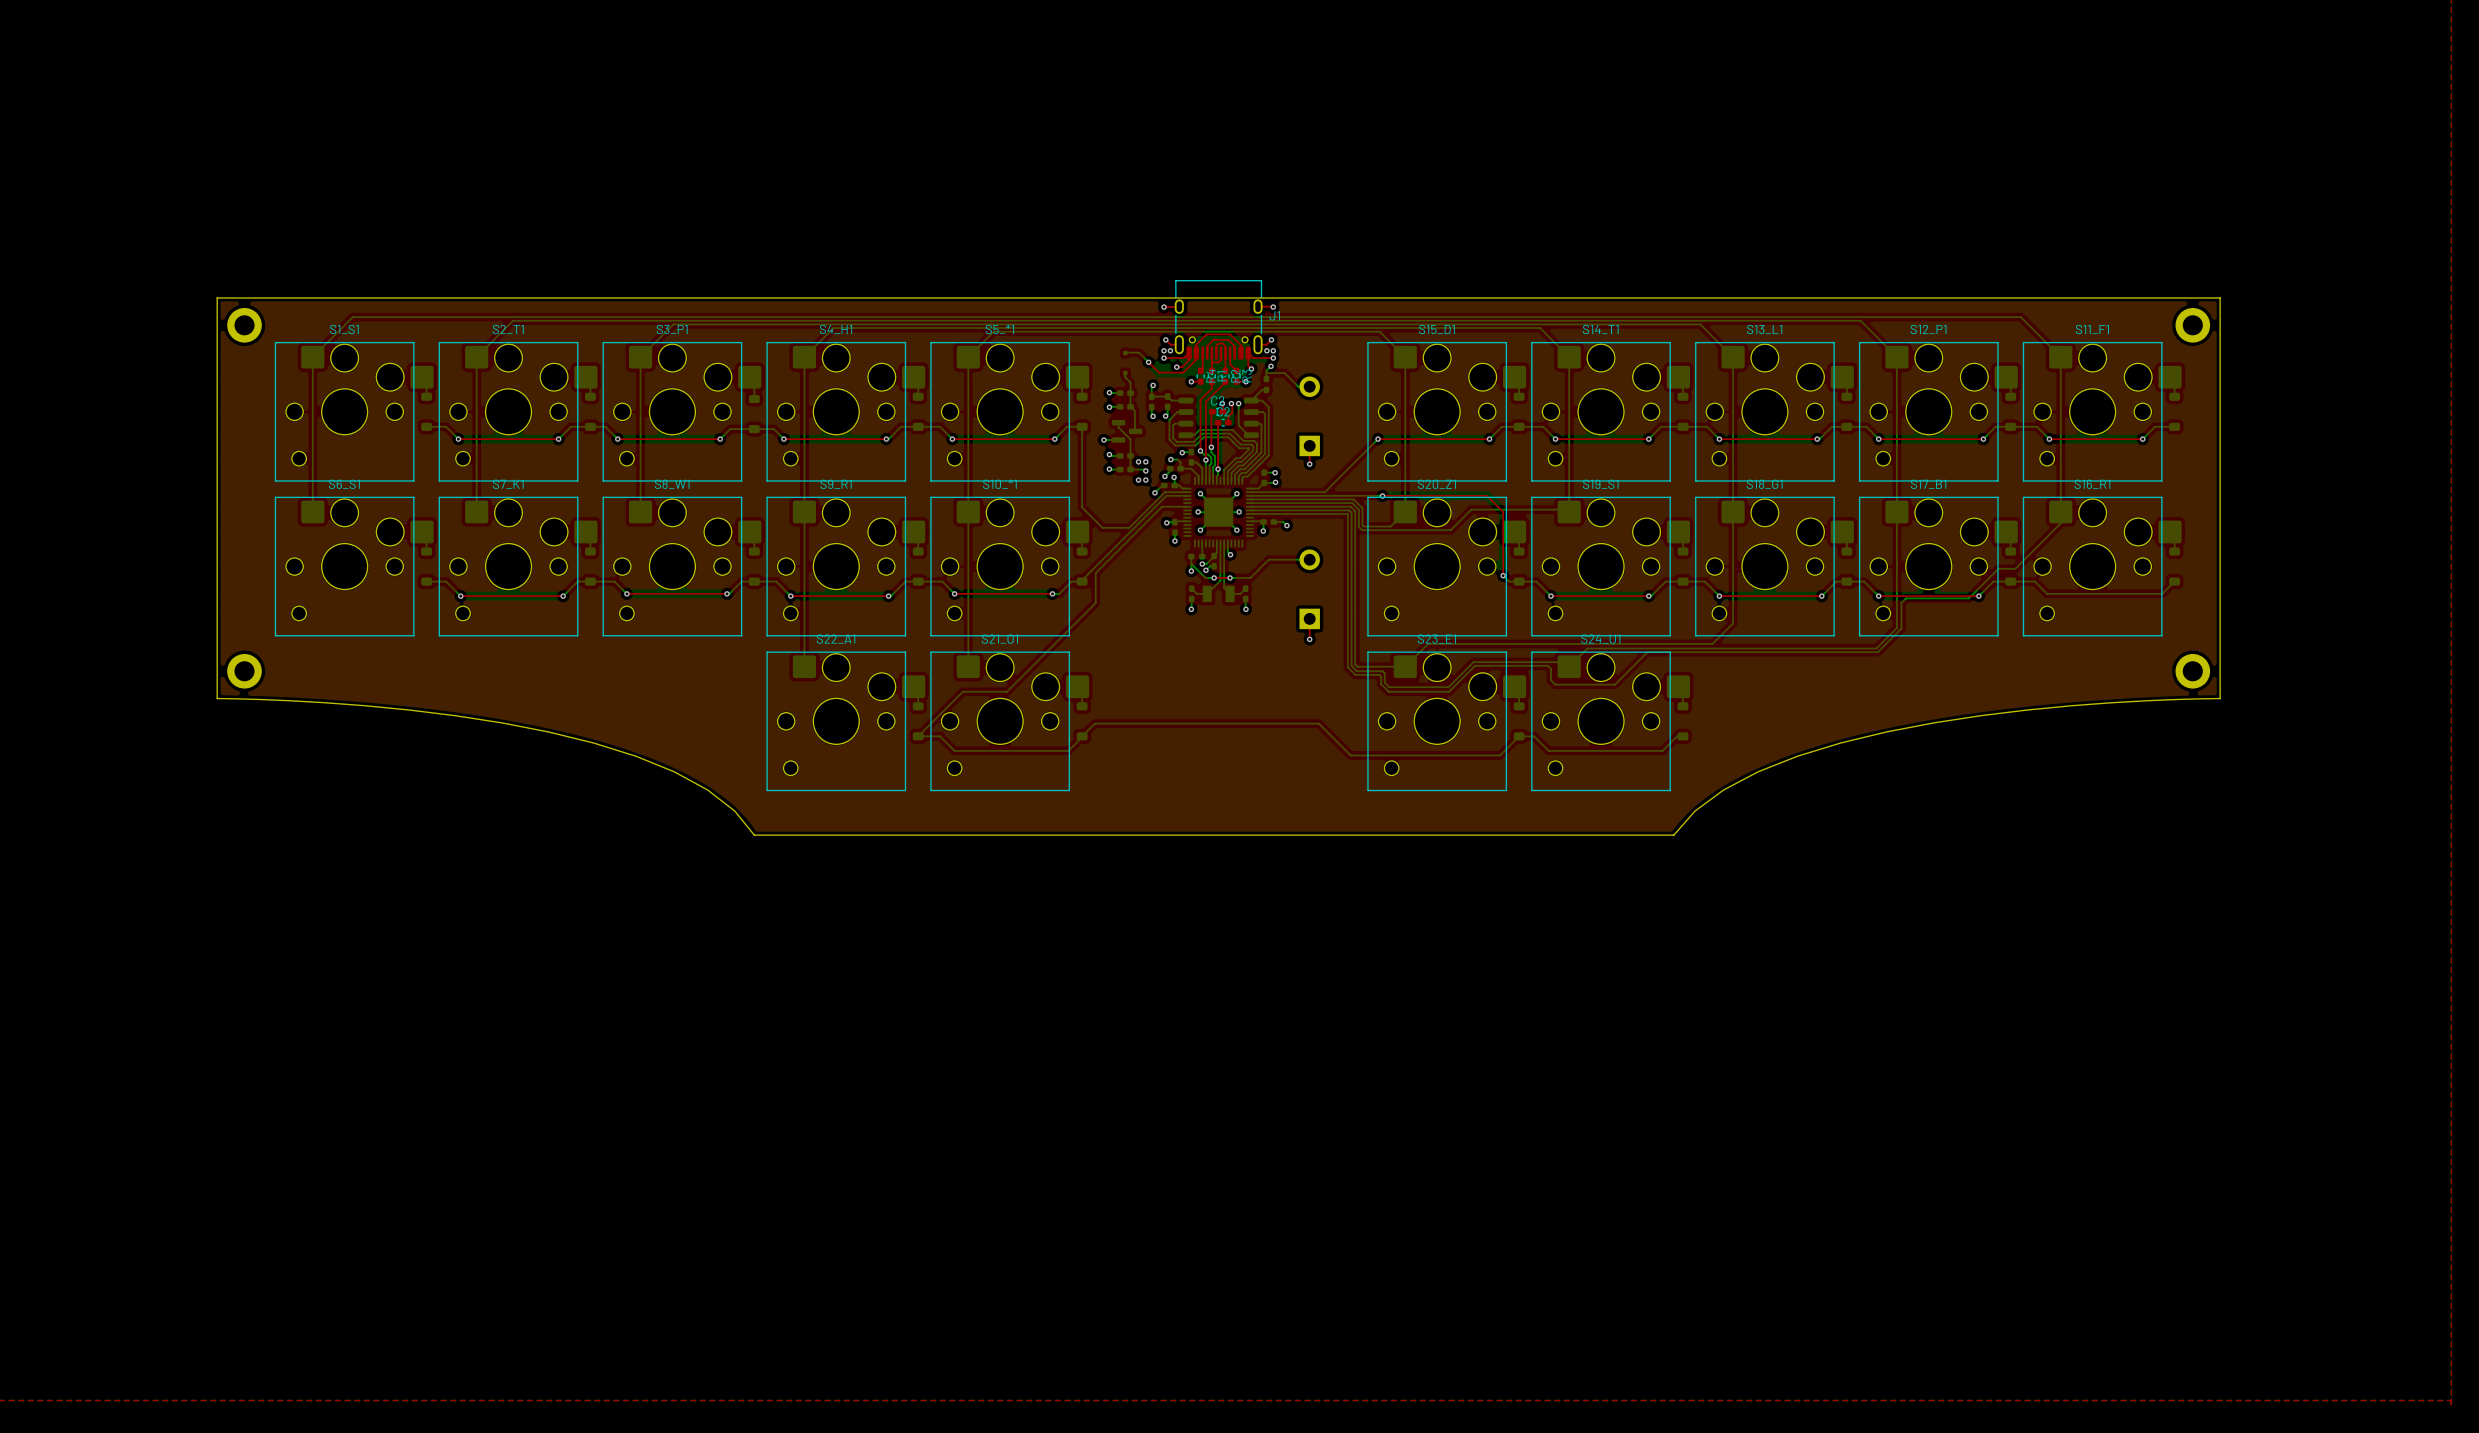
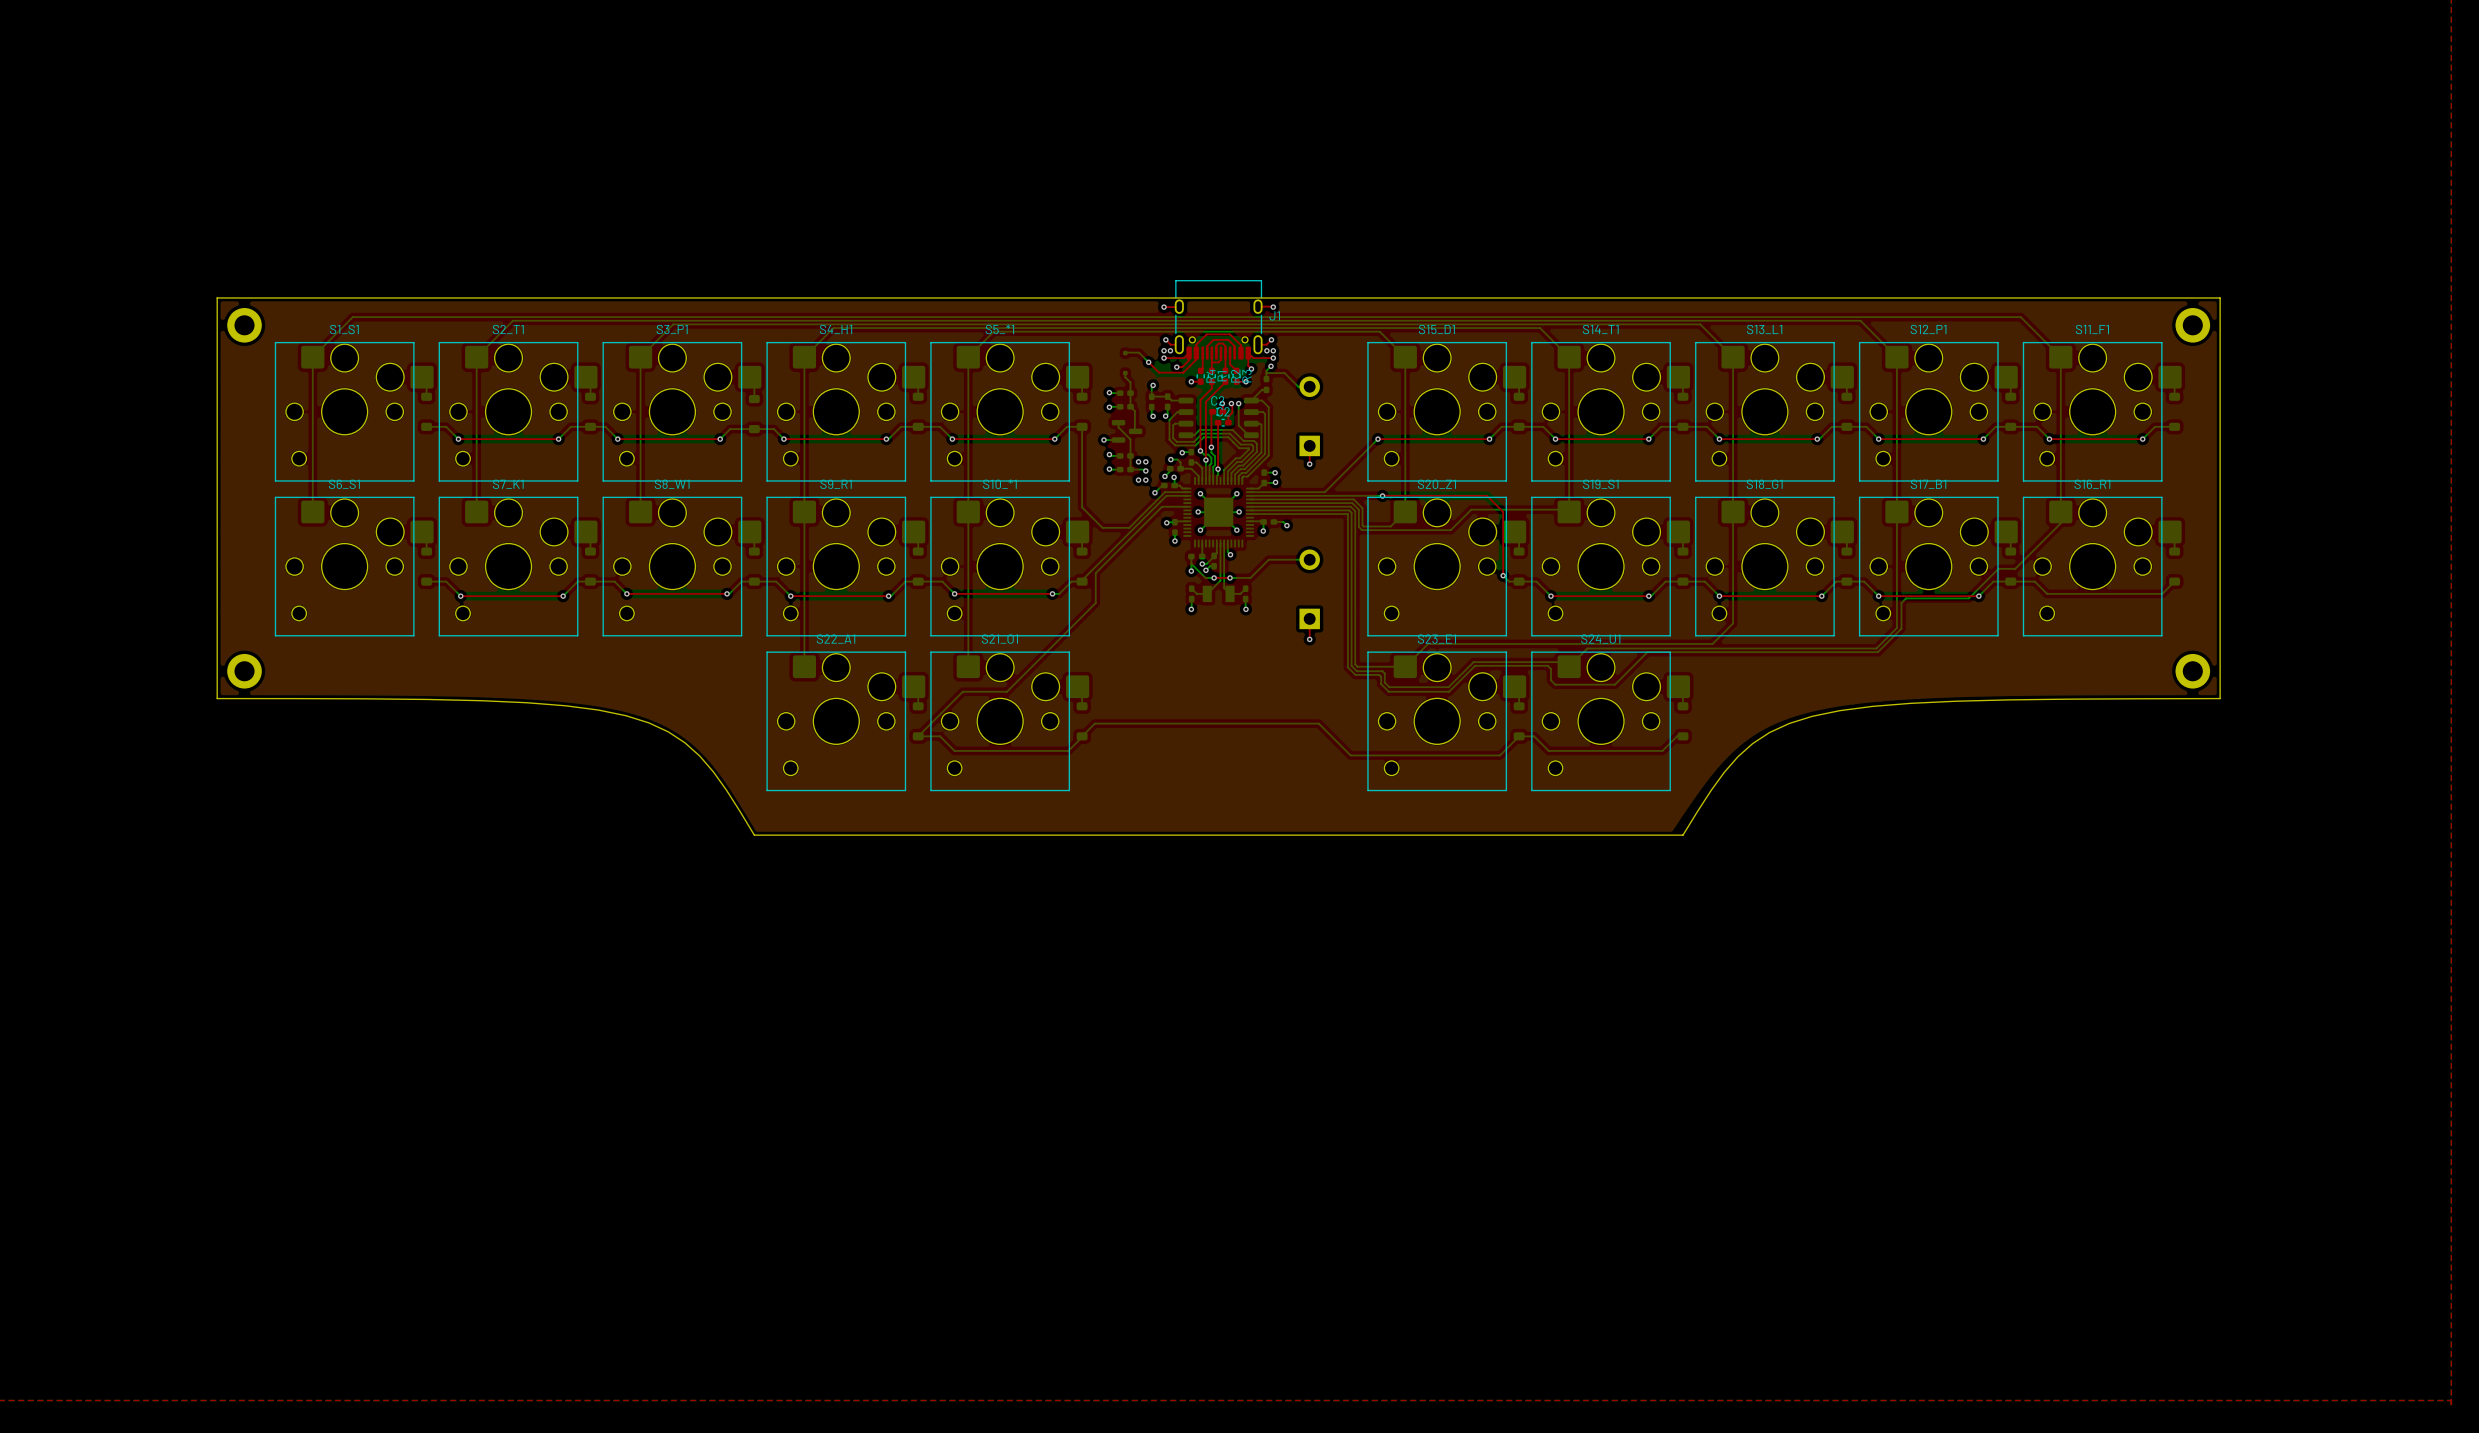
board edge: (217, 698) (325, 702) (409, 710) (501, 722) (593, 742) (635, 756) (674, 771) (707, 790) (734, 811) (754, 835) -> (217, 698) (481, 700) (565, 705) (625, 715) (668, 731) (699, 756) (726, 790) (754, 835)
board edge: (2220, 698) (2111, 702) (2027, 710) (1933, 722) (1840, 742) (1797, 756) (1758, 771) (1723, 790) (1695, 811) (1673, 835) -> (2220, 698) (1956, 701) (1872, 706) (1812, 716) (1789, 723) (1769, 732) (1752, 743) (1724, 772) (1682, 835) (1673, 835)

